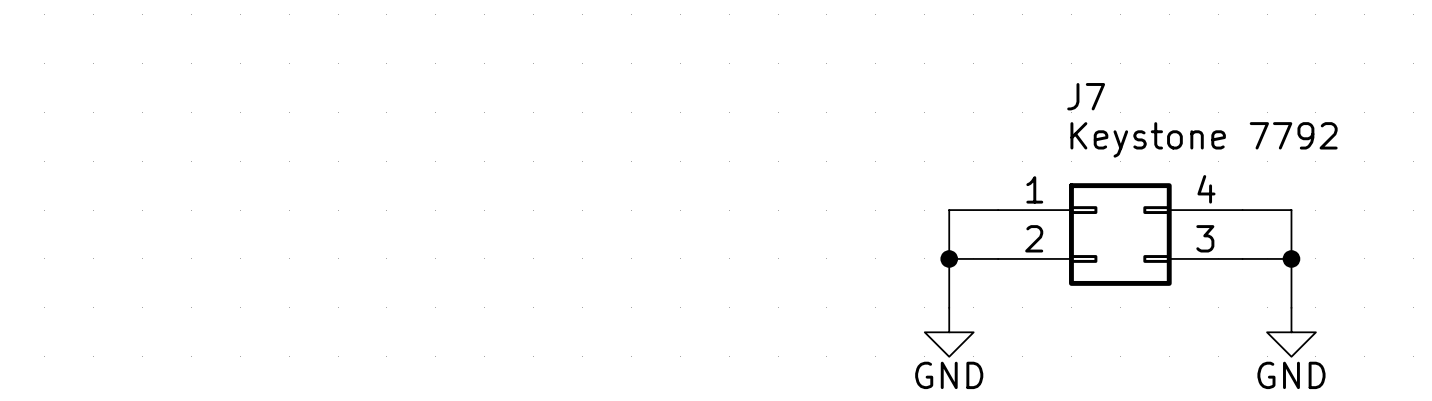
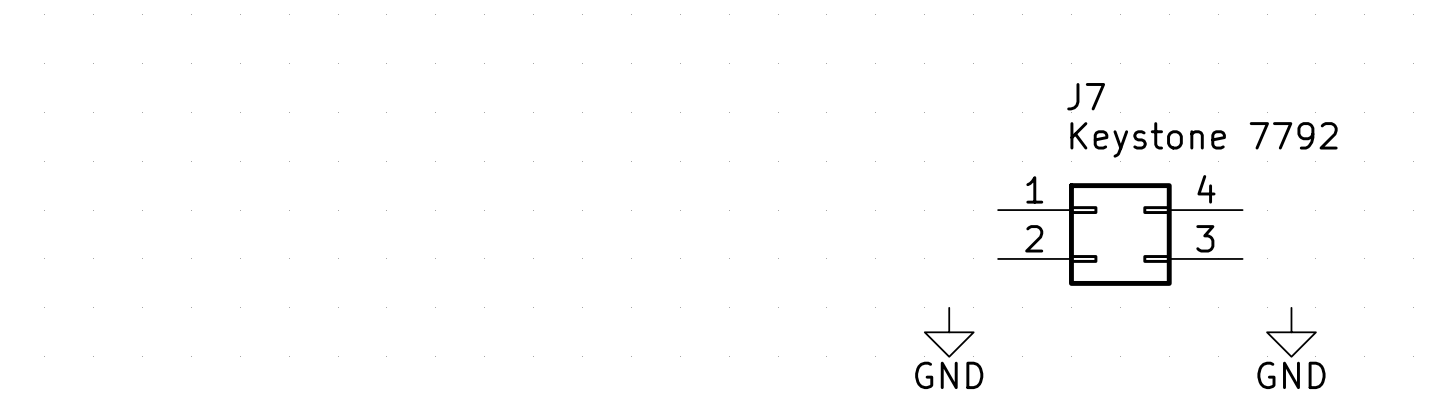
wire: (998, 210) (949, 210) (949, 307) -> none
wire: (1242, 210) (1291, 210) (1291, 307) -> none
wire: (949, 258) (998, 258) -> none
junction: (949, 258) -> none
wire: (1242, 258) (1291, 258) -> none
junction: (1291, 258) -> none

